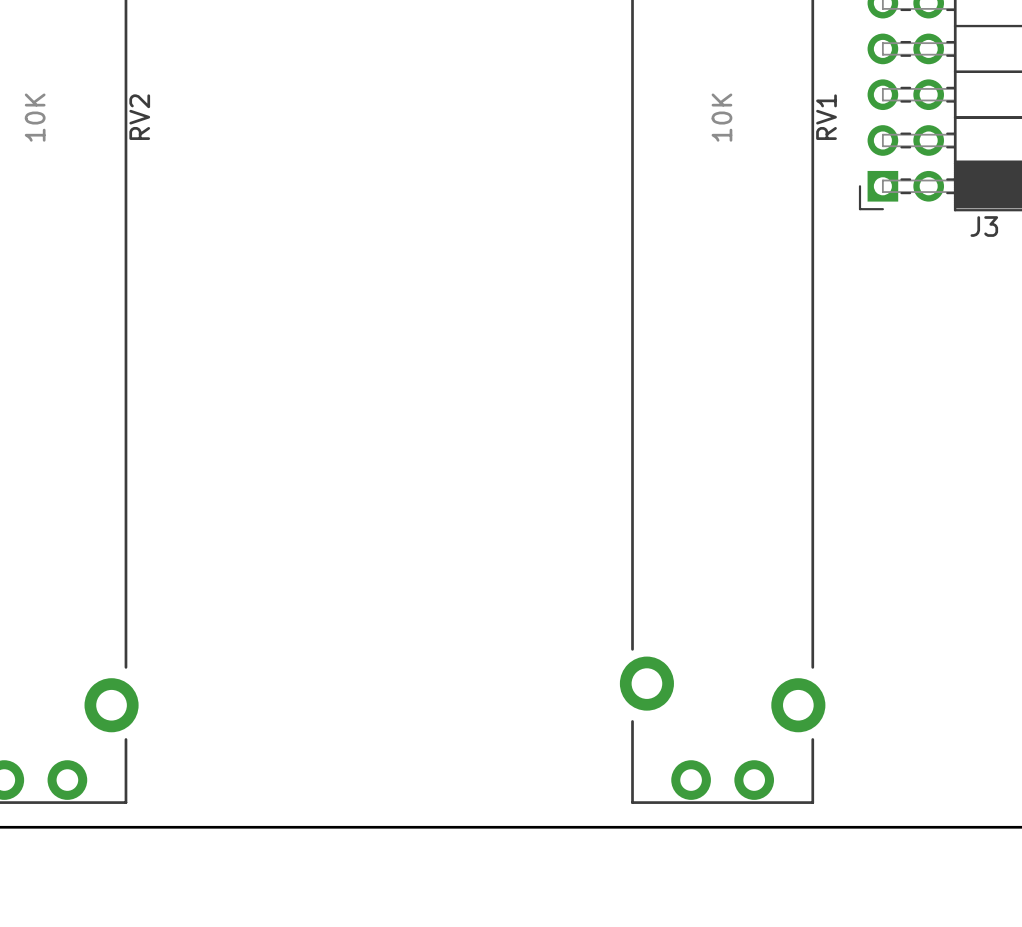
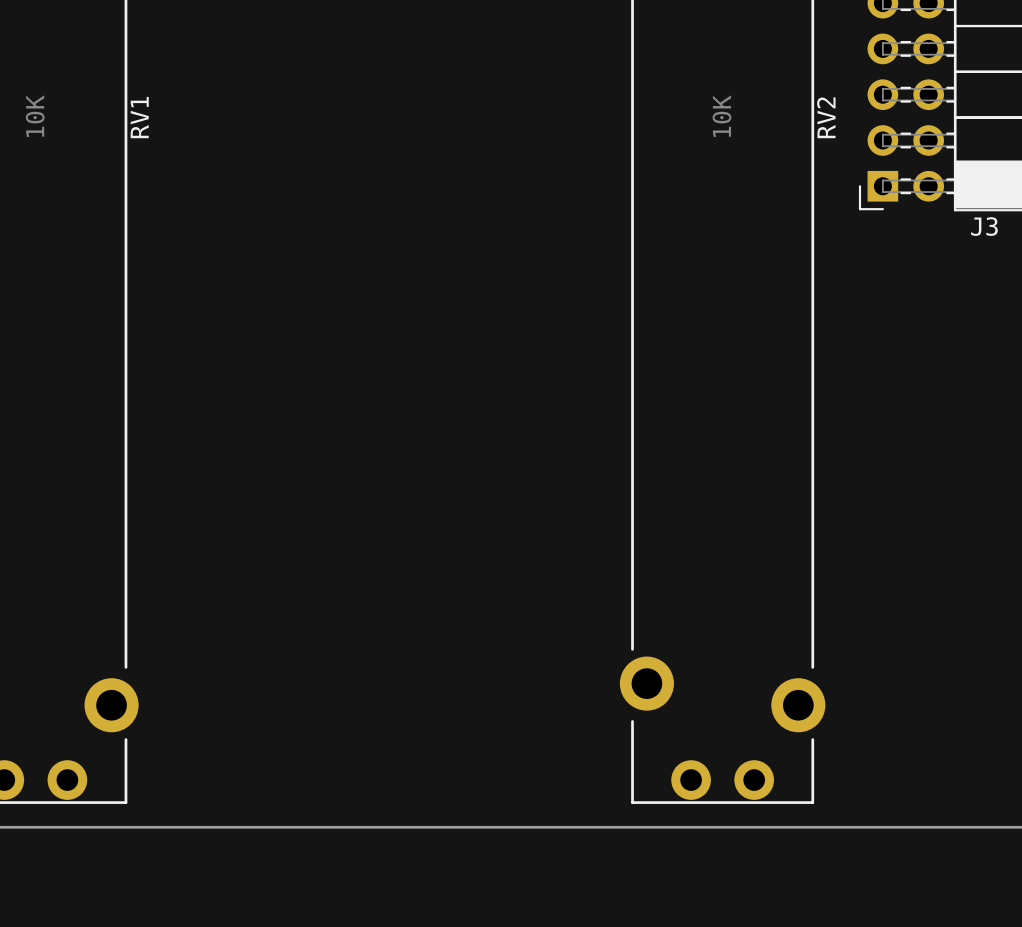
RV2 name: RV2 (139, 117) -> RV1 (139, 117)
RV1 name: RV1 (826, 117) -> RV2 (826, 117)

